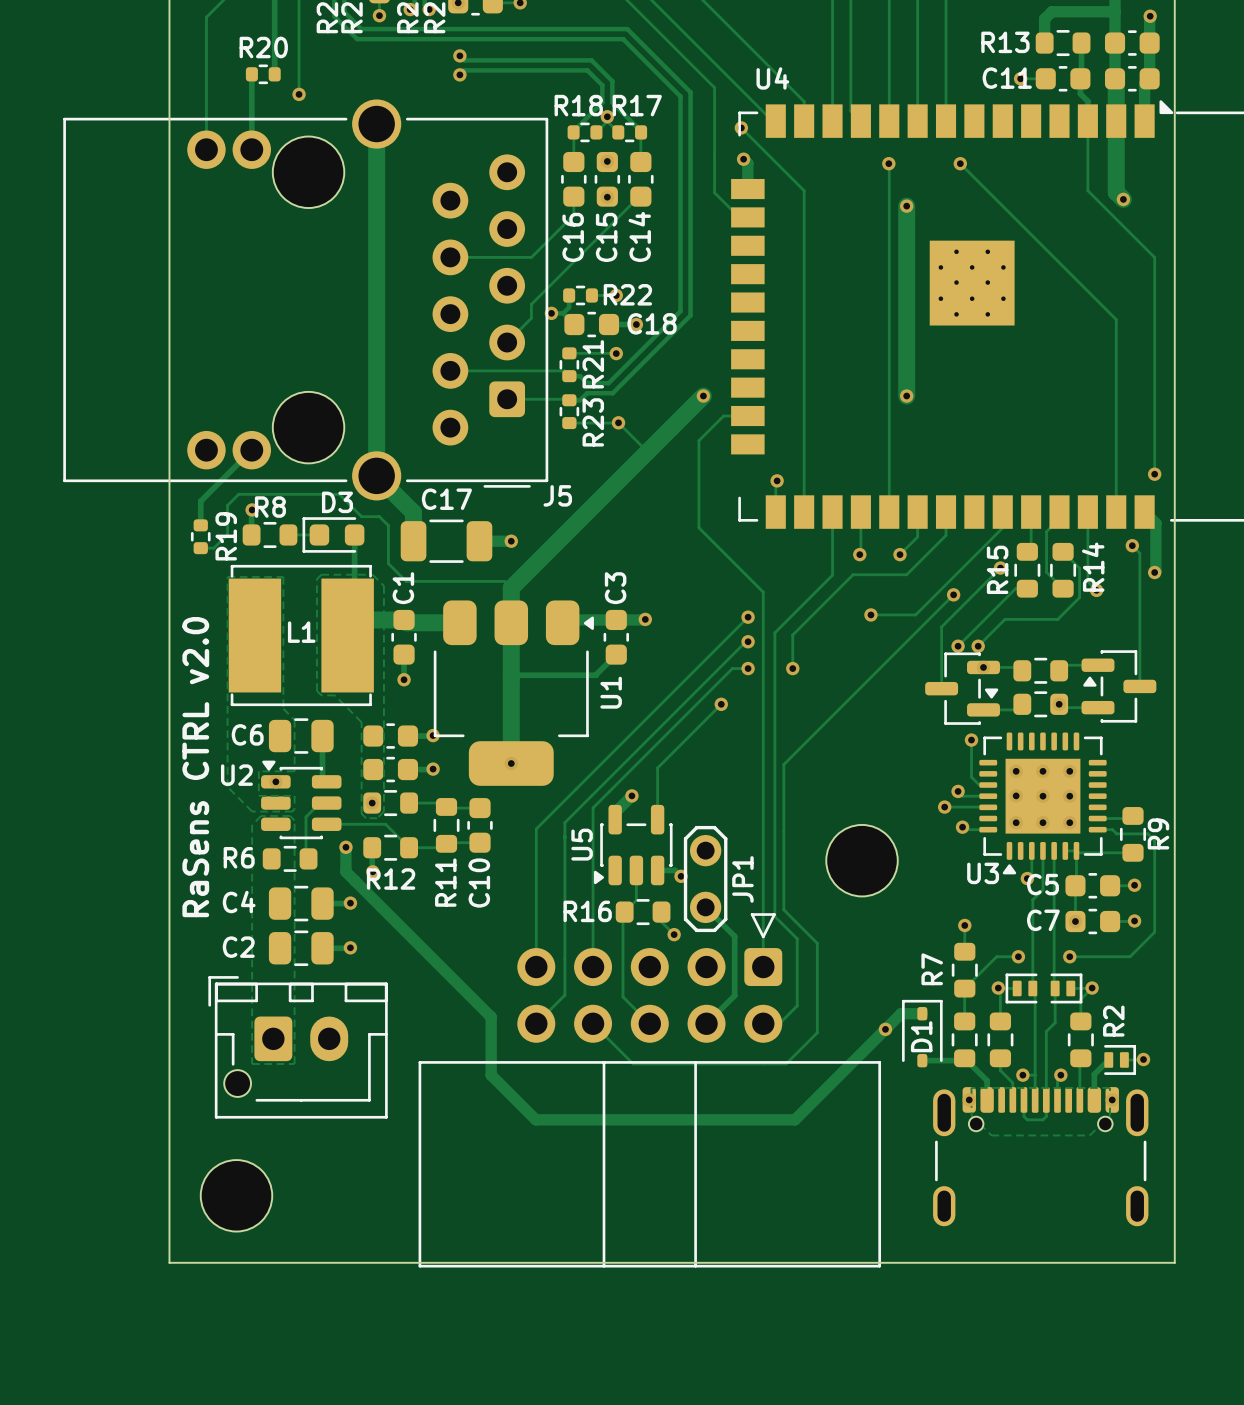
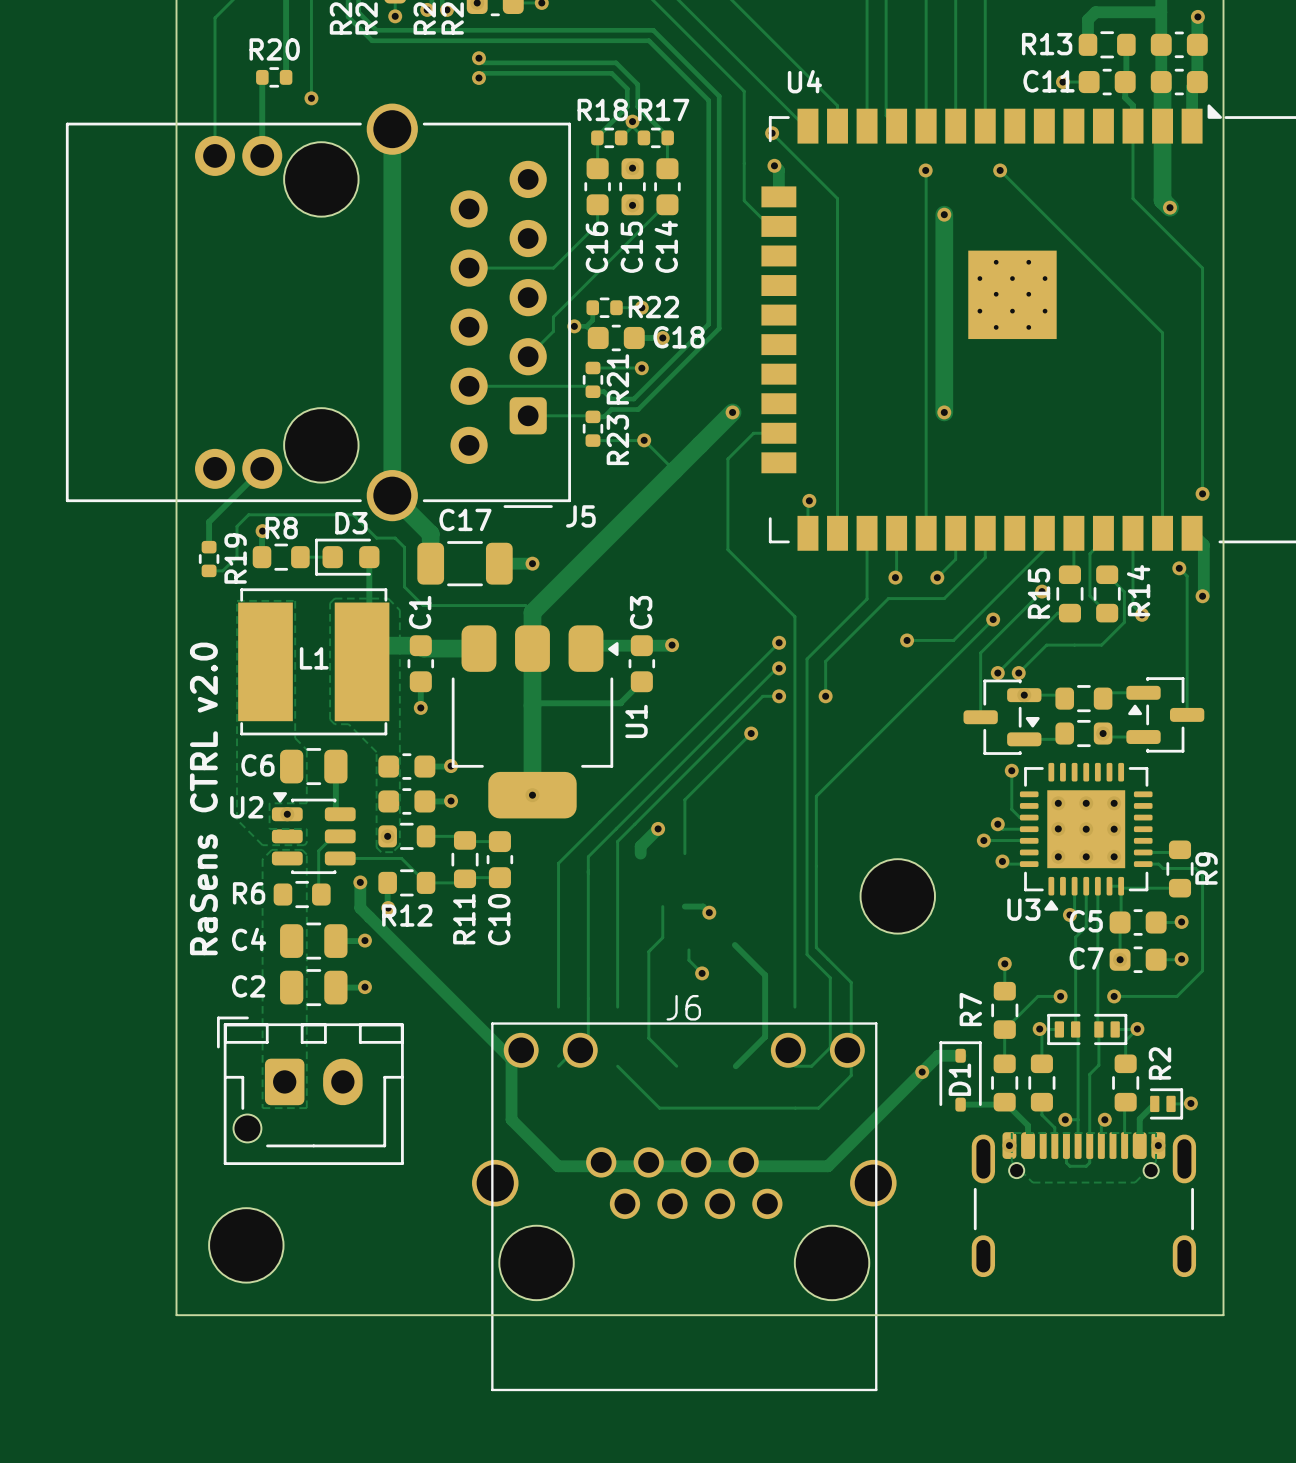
U5: (633, 845) -> none
JP1: (705, 879) -> none
R16: (643, 912) -> none
part: (649, 1090) -> none
J6: none -> (684, 1206)

